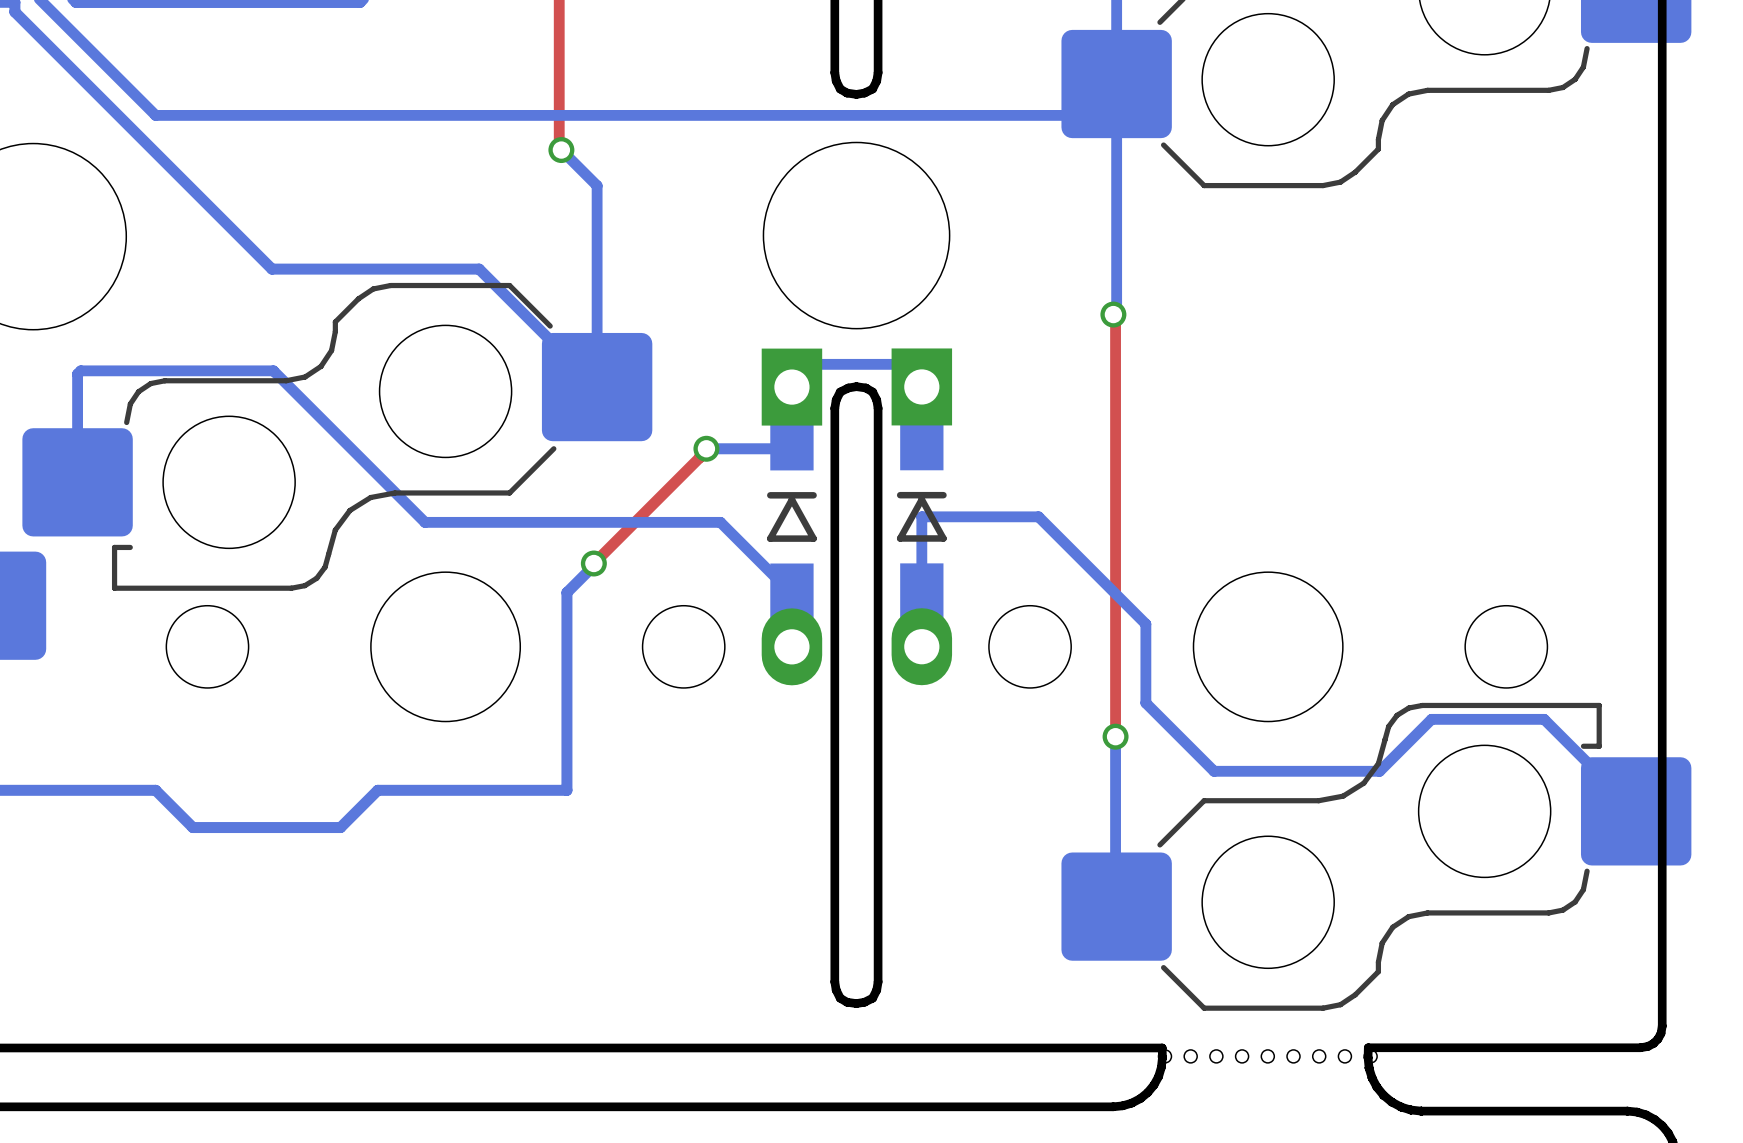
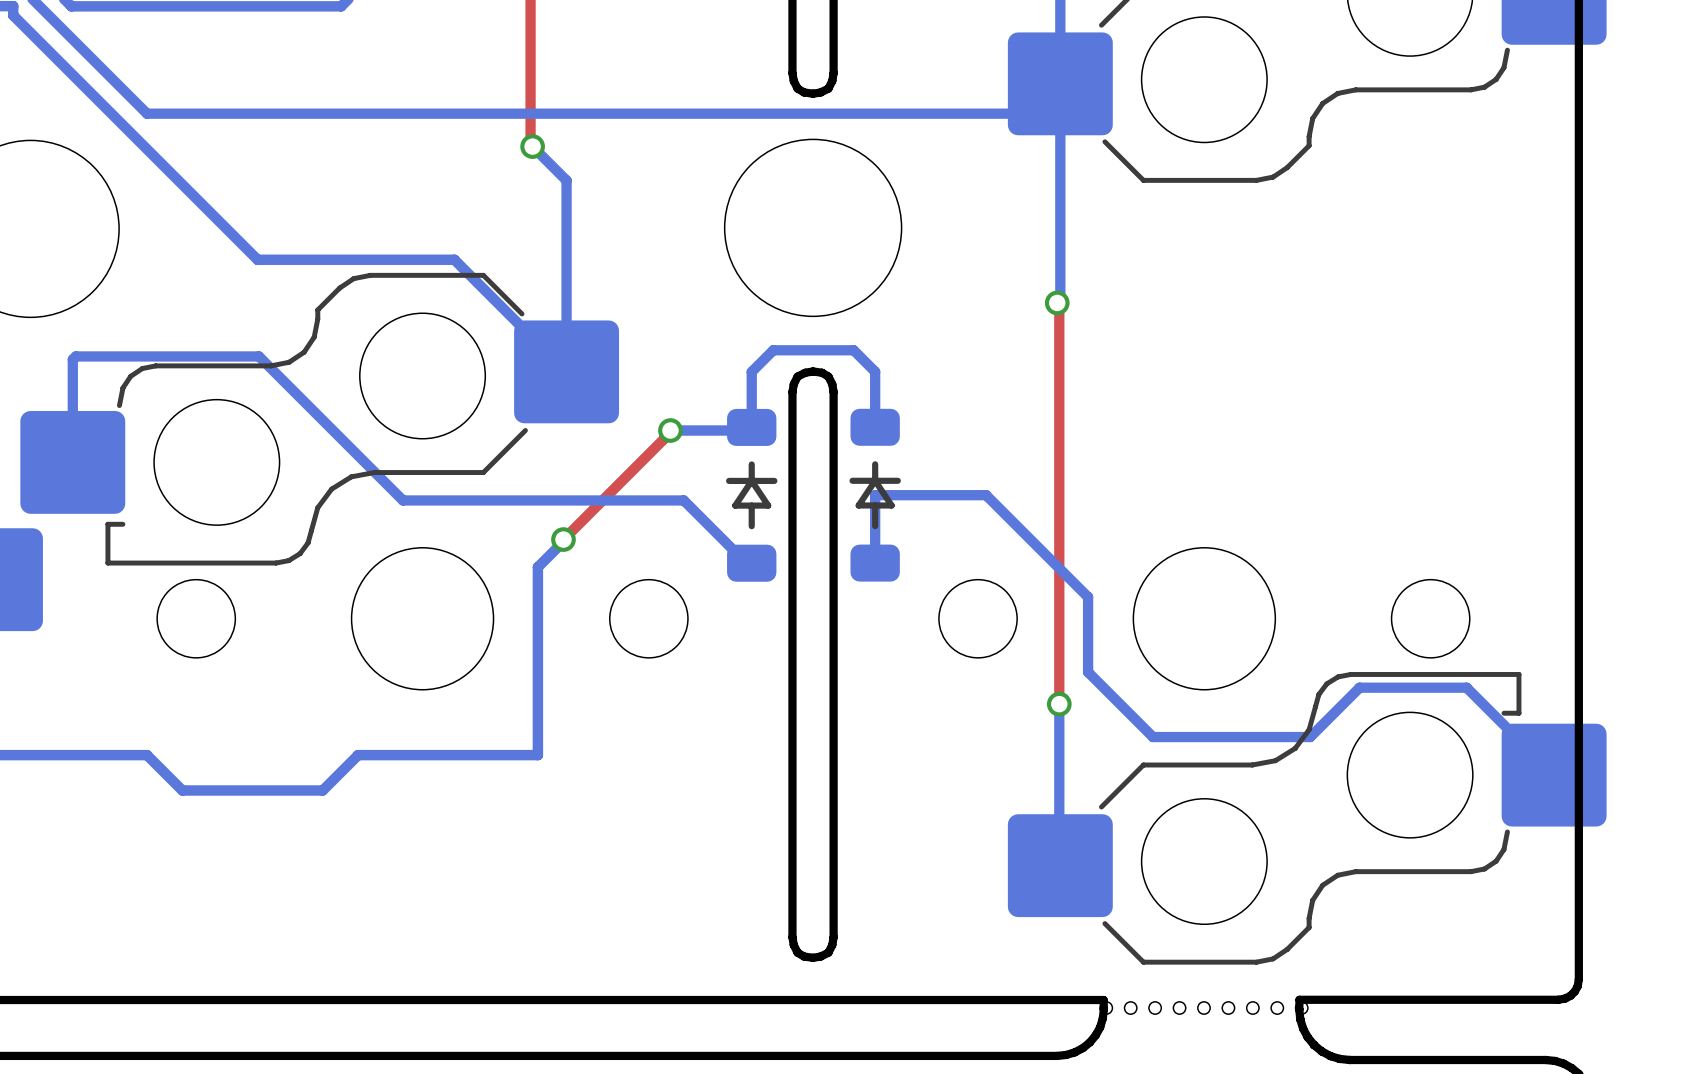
part footprint: [761, 348, 823, 686] -> [726, 408, 778, 582]
part footprint: [891, 348, 953, 686] -> [849, 408, 901, 582]

